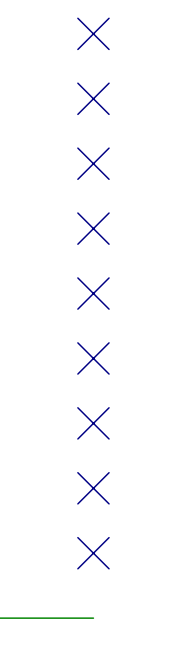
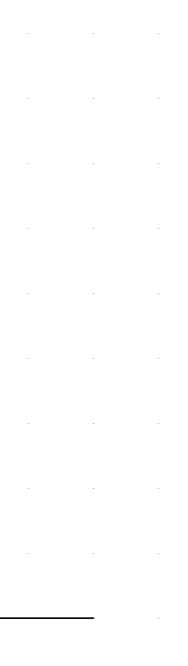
no-connect mark: (93, 33) -> none
no-connect mark: (93, 98) -> none
no-connect mark: (93, 163) -> none
no-connect mark: (93, 228) -> none
no-connect mark: (93, 293) -> none
no-connect mark: (93, 358) -> none
no-connect mark: (93, 423) -> none
no-connect mark: (93, 488) -> none
no-connect mark: (93, 553) -> none

